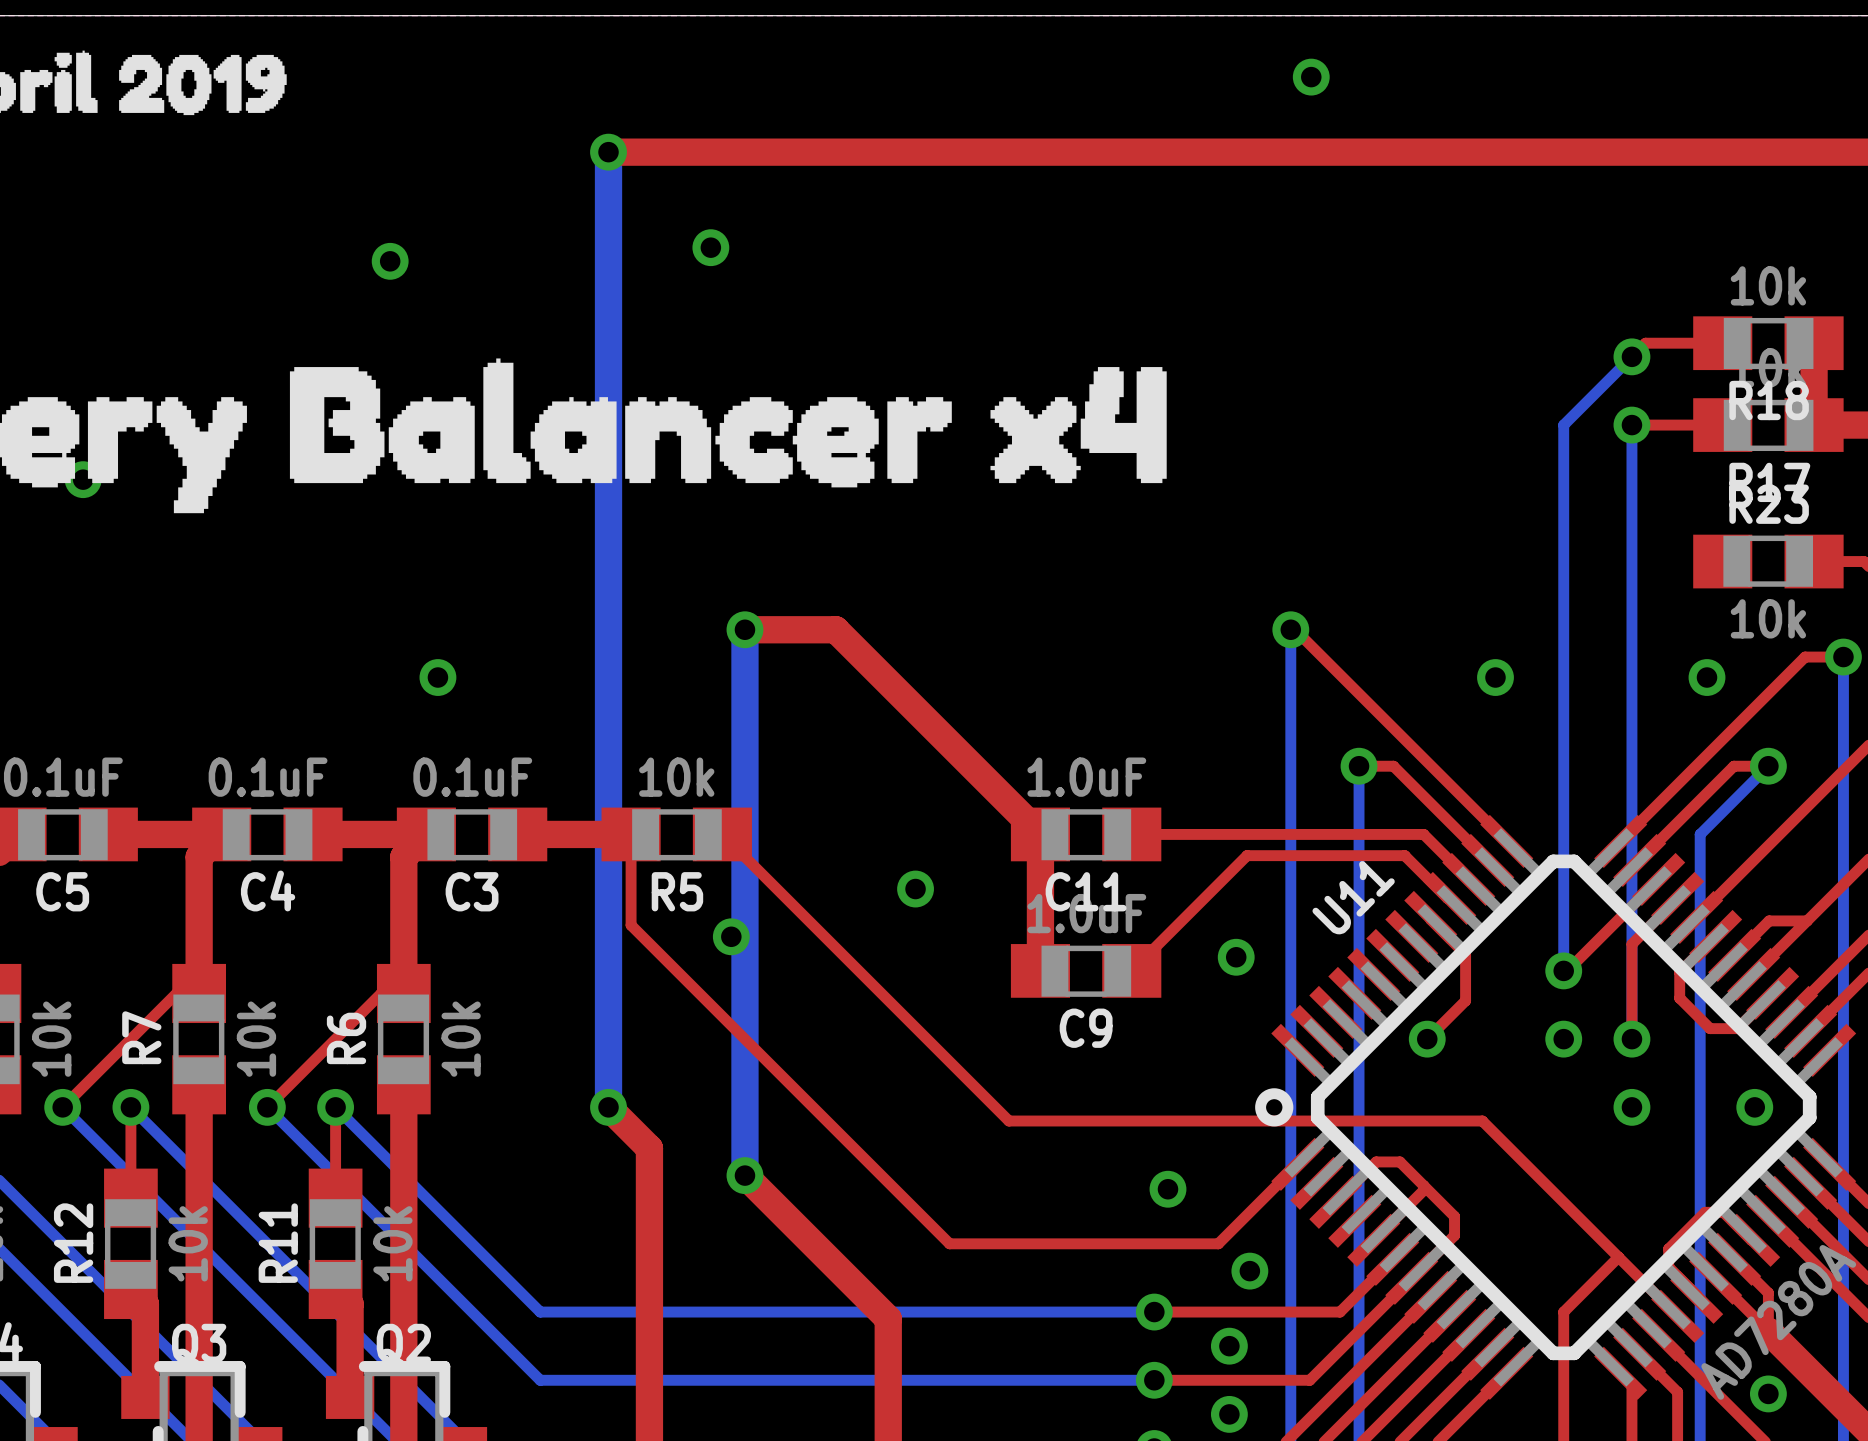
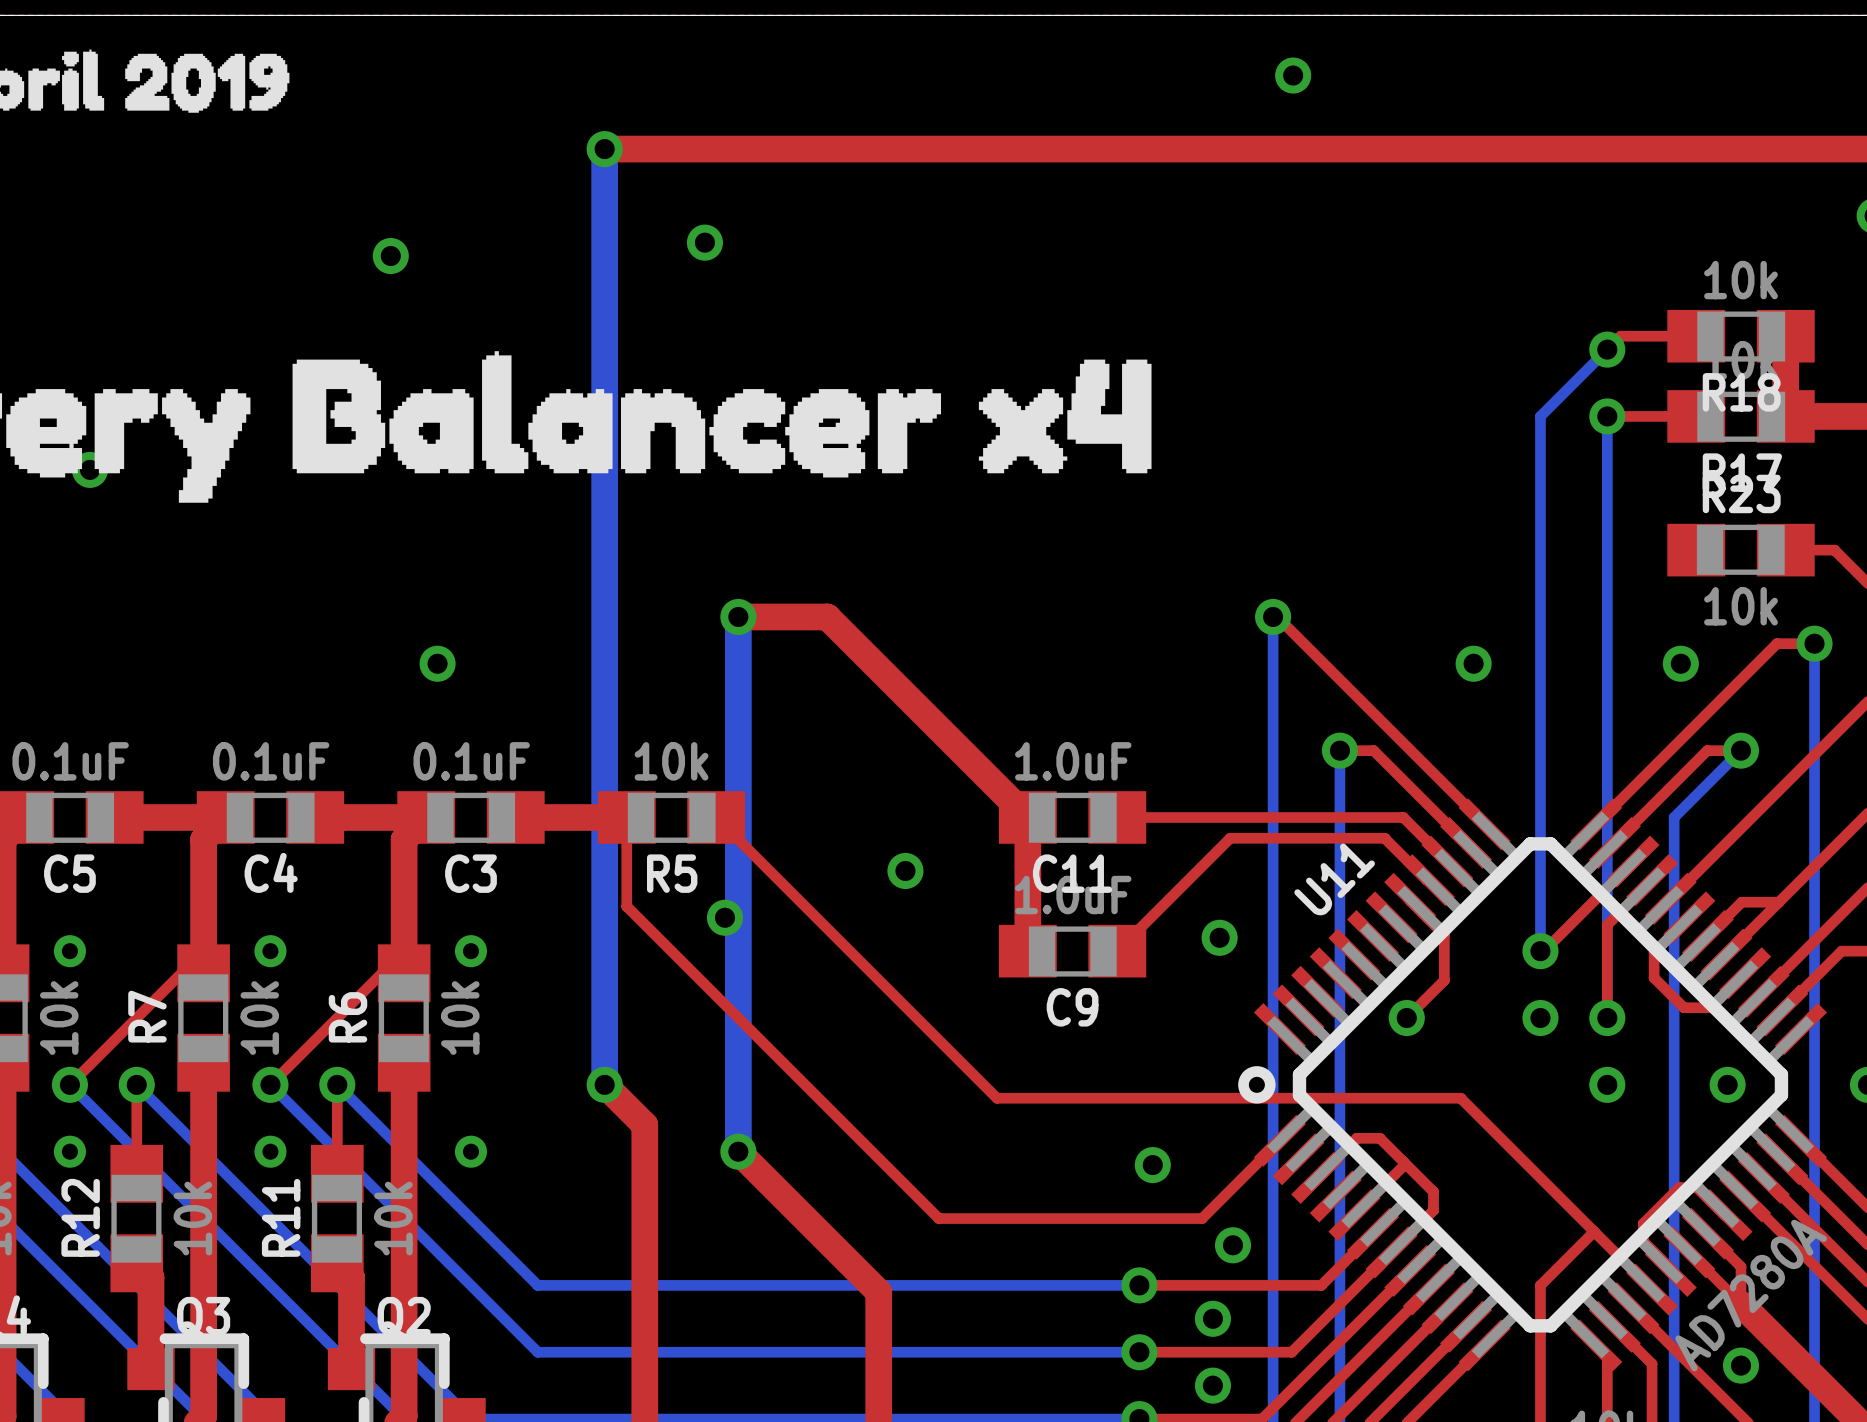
via: none -> (69, 951)
via: none -> (270, 951)
via: none -> (470, 951)
via: none -> (69, 1151)
via: none -> (270, 1151)
via: none -> (470, 1151)

